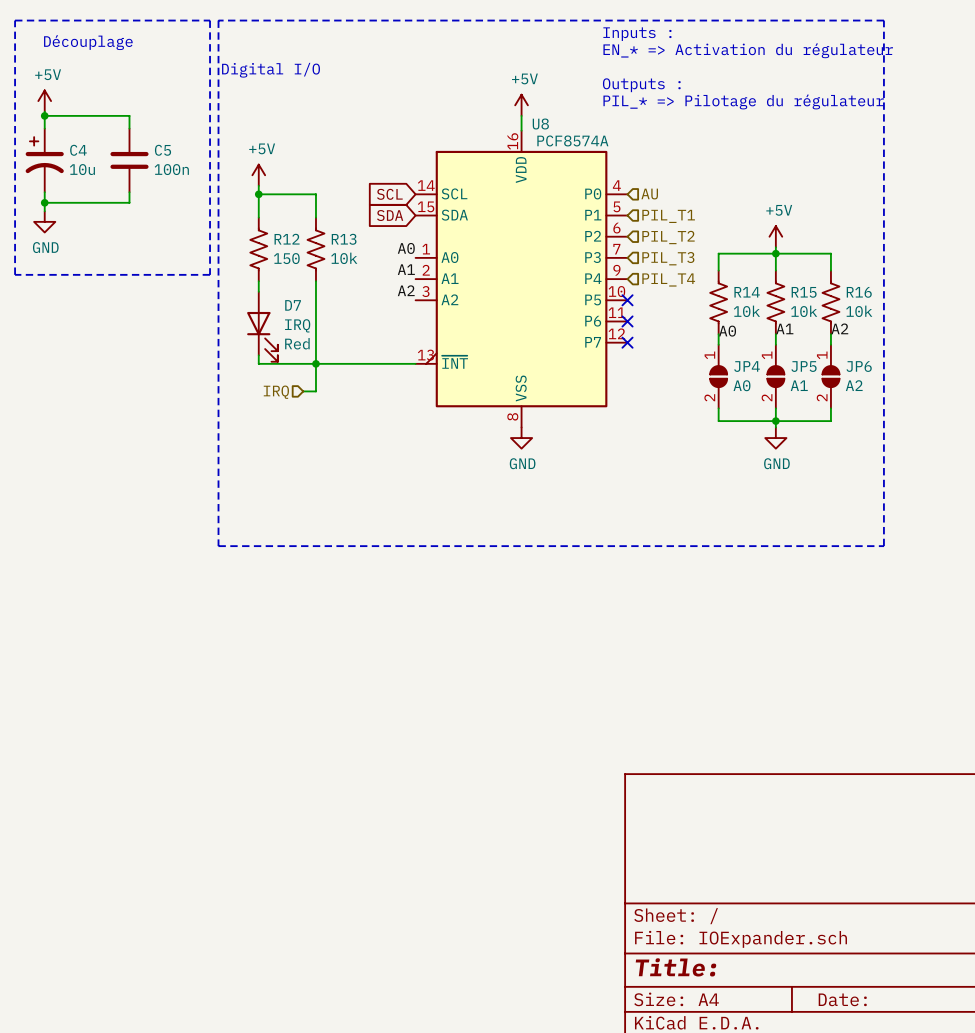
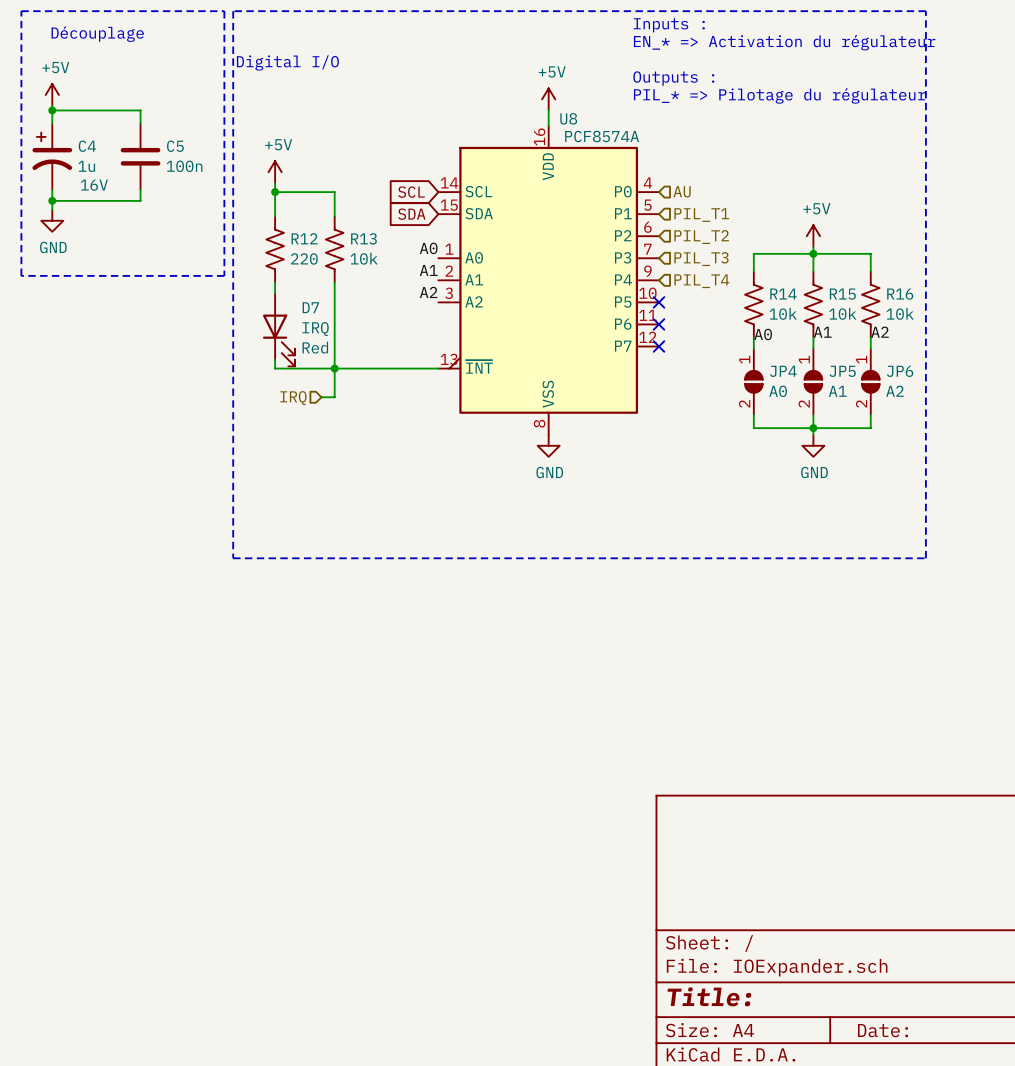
C4 value: 10u (82, 169) -> 1u (86, 166)
C4 text: none -> 16V (94, 185)
R12 value: 150 (286, 258) -> 220 (304, 258)

